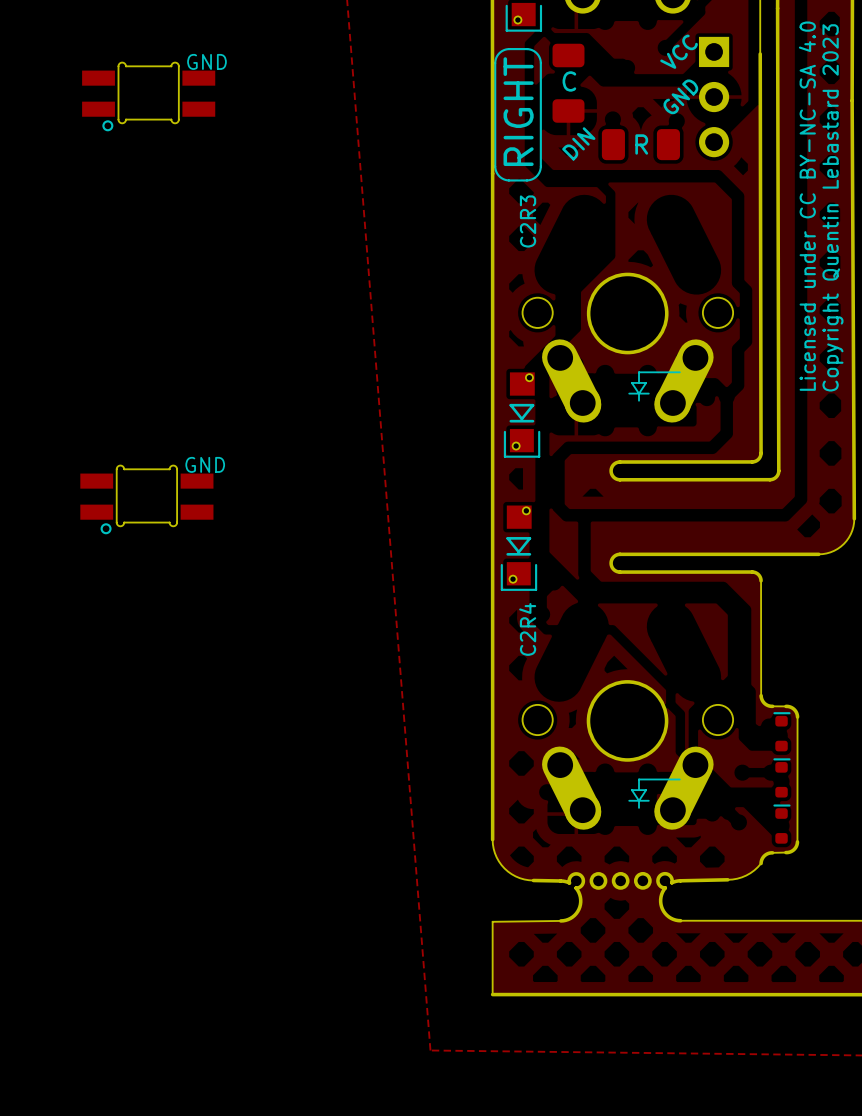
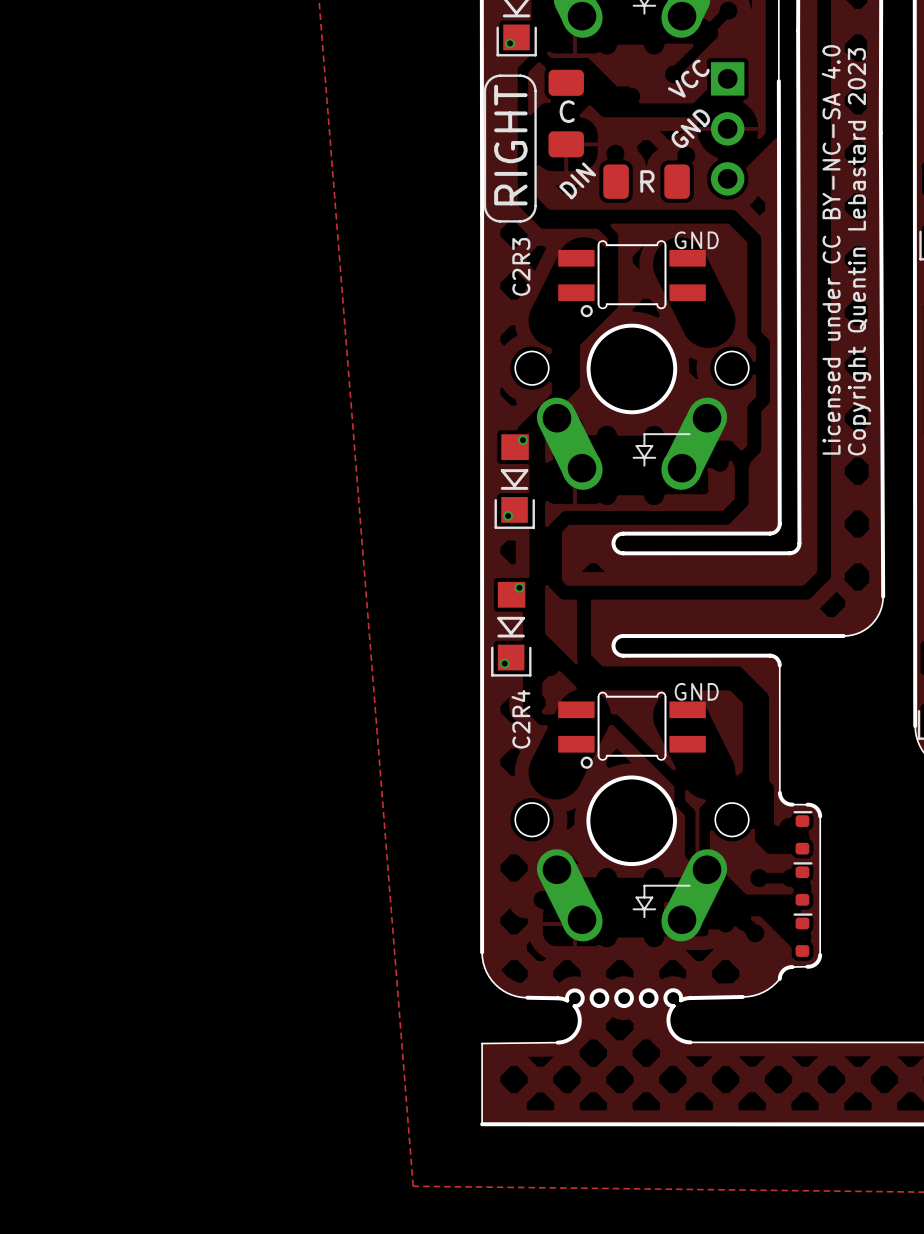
part: (148, 96) -> none
part: none -> (632, 278)
part: (146, 499) -> none
part: none -> (632, 730)

